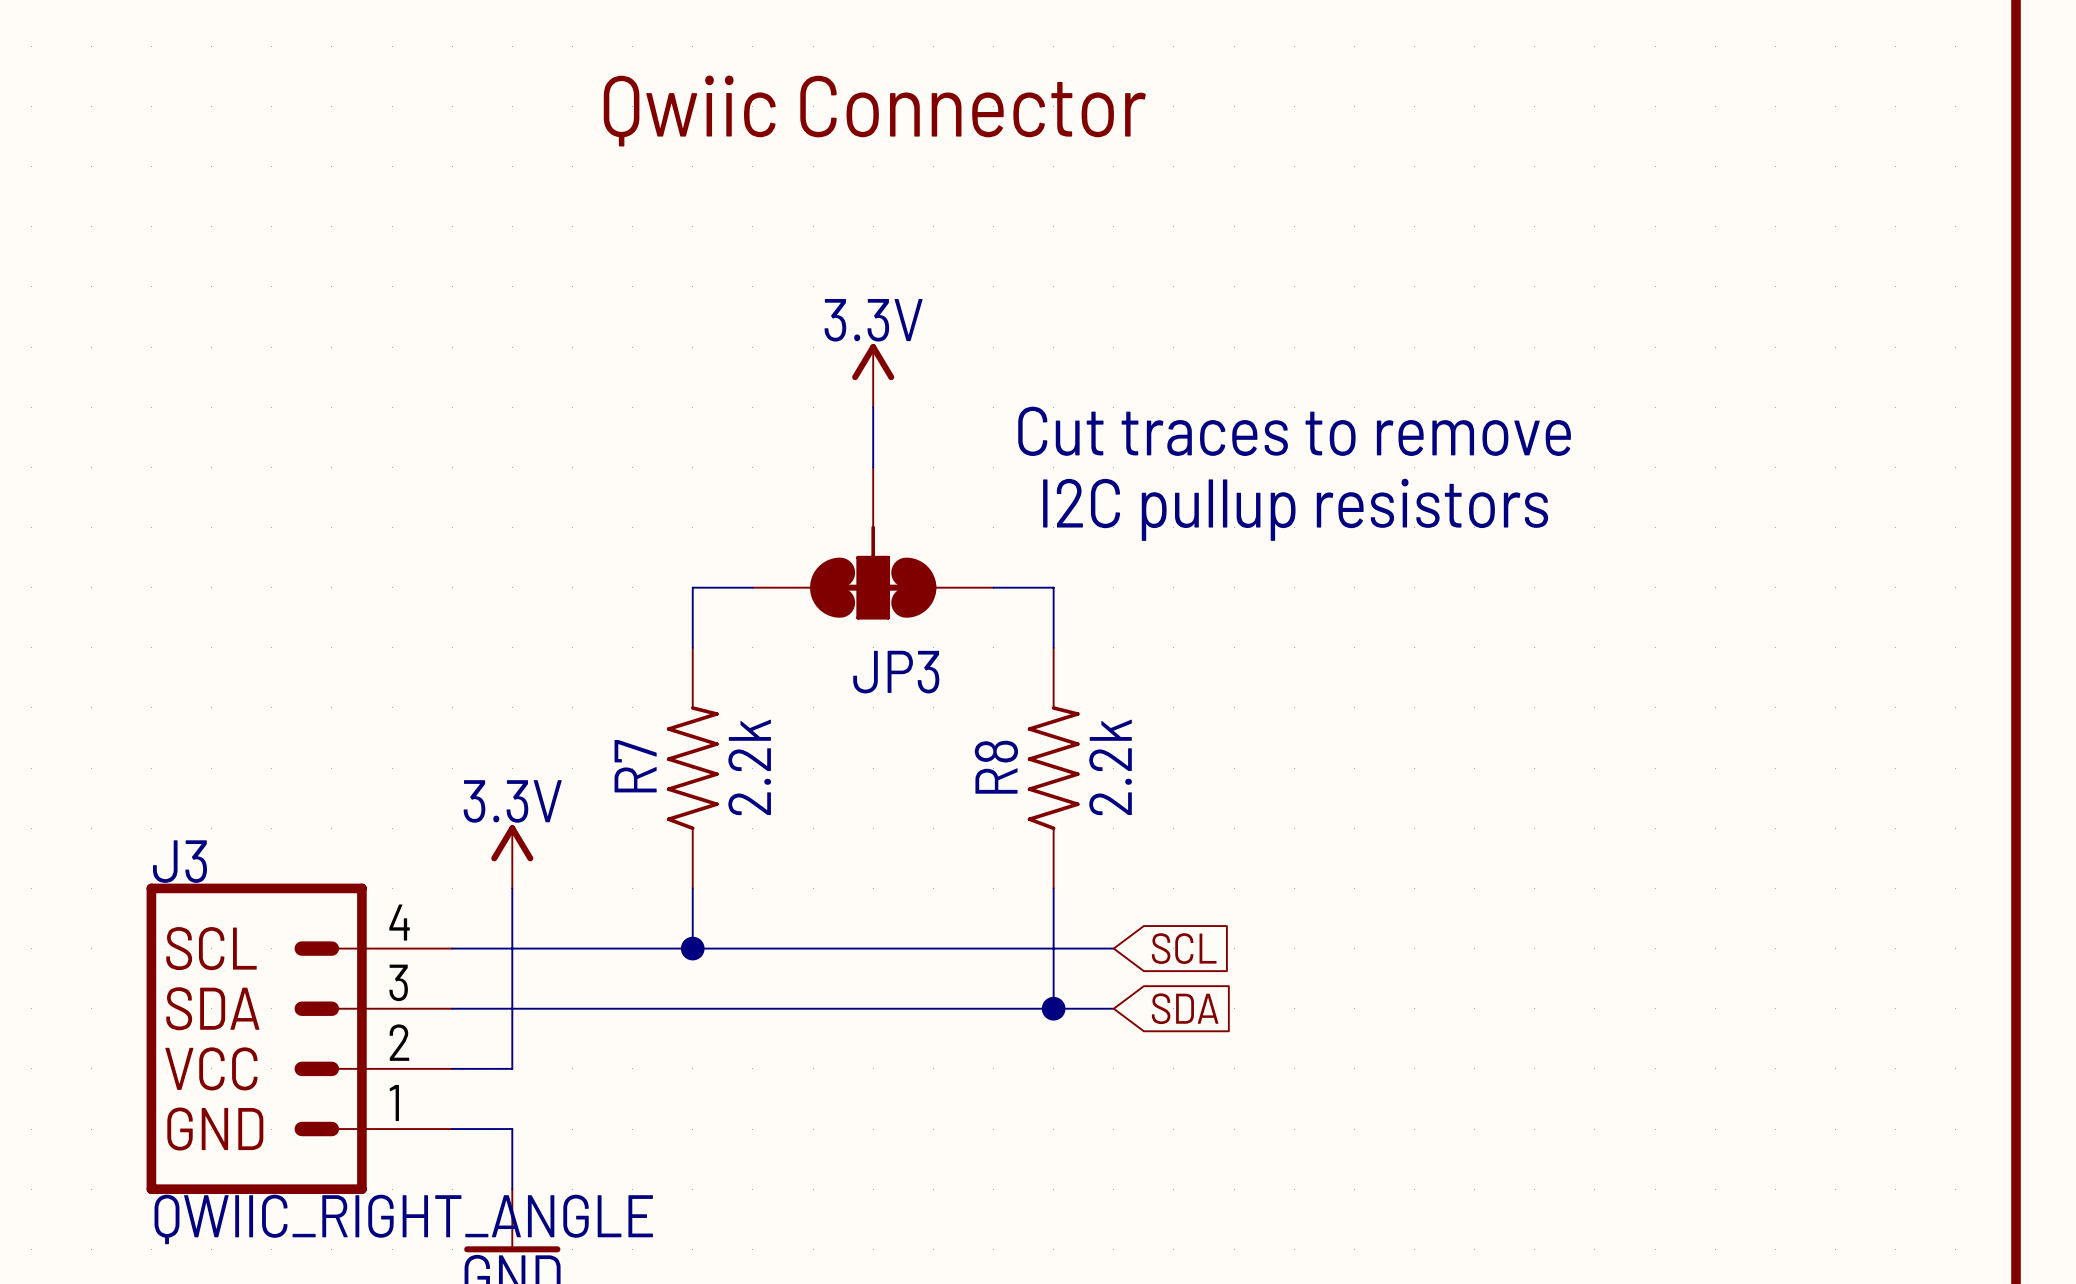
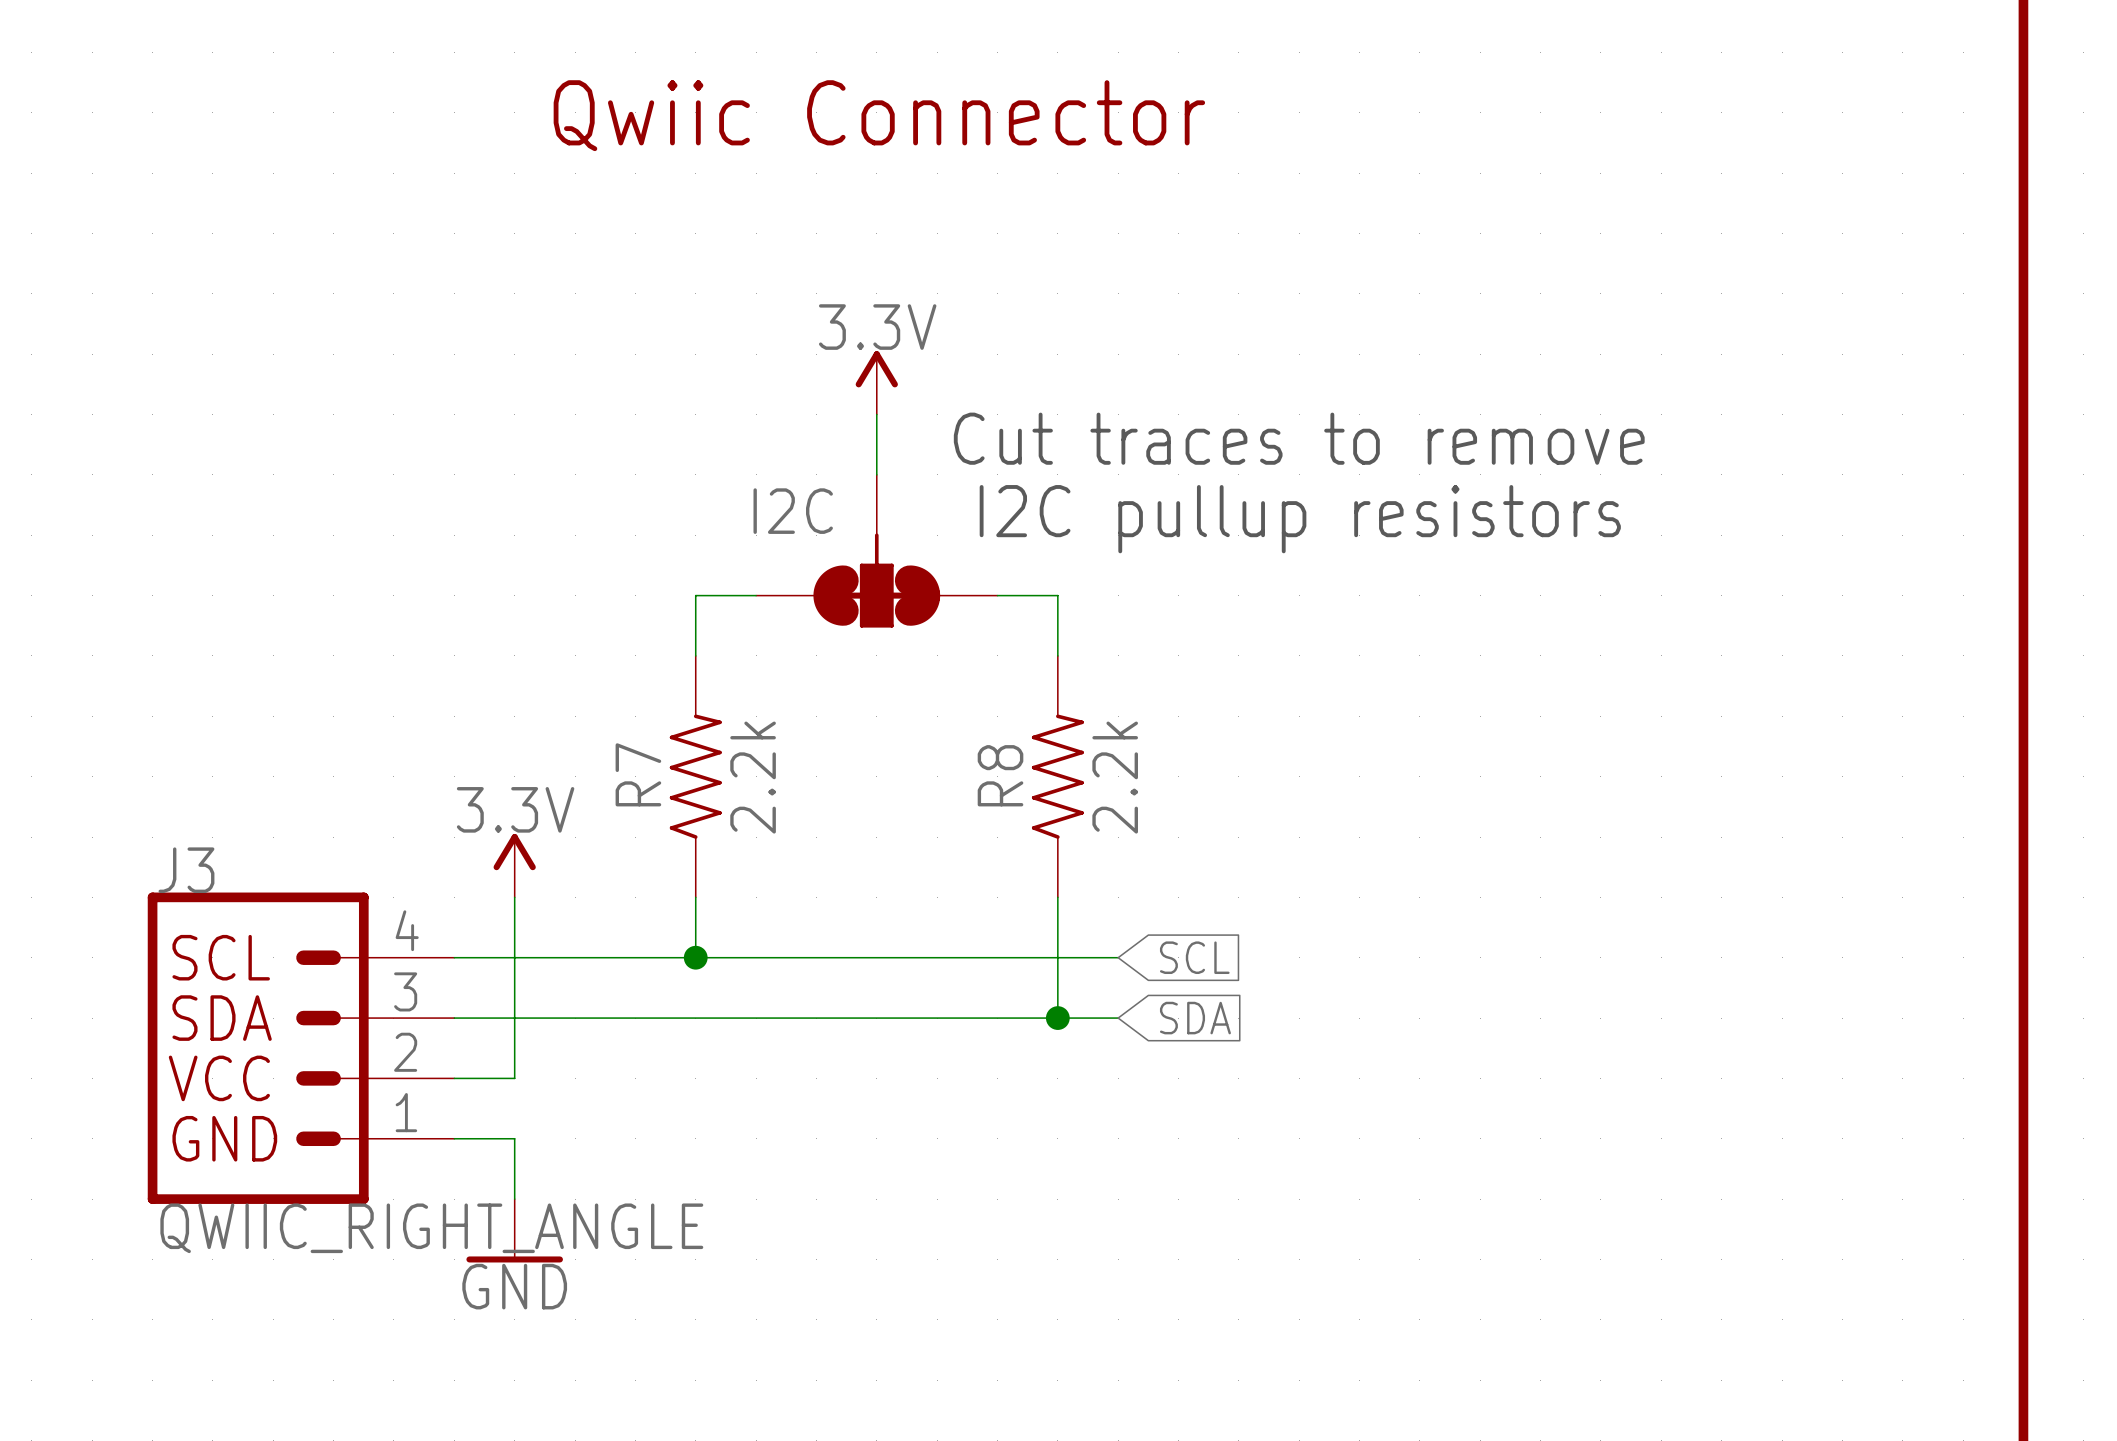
JP3 name: JP3 (896, 672) -> I2C (793, 511)

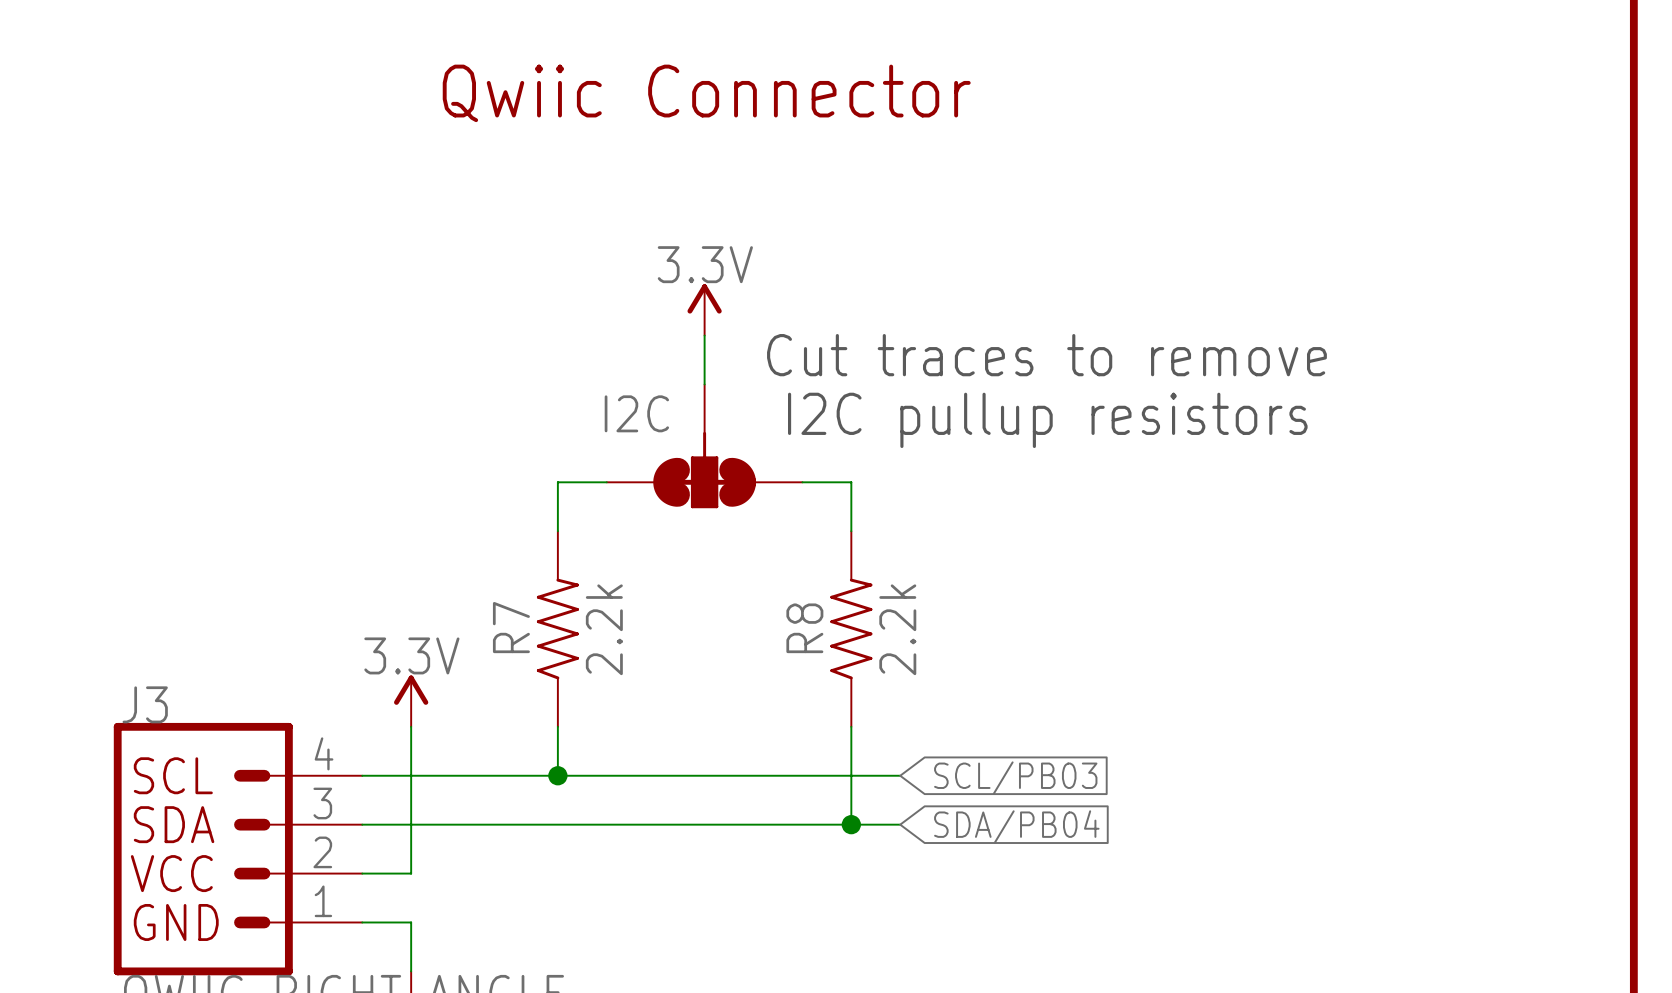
global label: SCL (1194, 957) -> SCL/PB03 (1015, 778)
global label: SDA (1195, 1018) -> SDA/PB04 (1016, 826)

